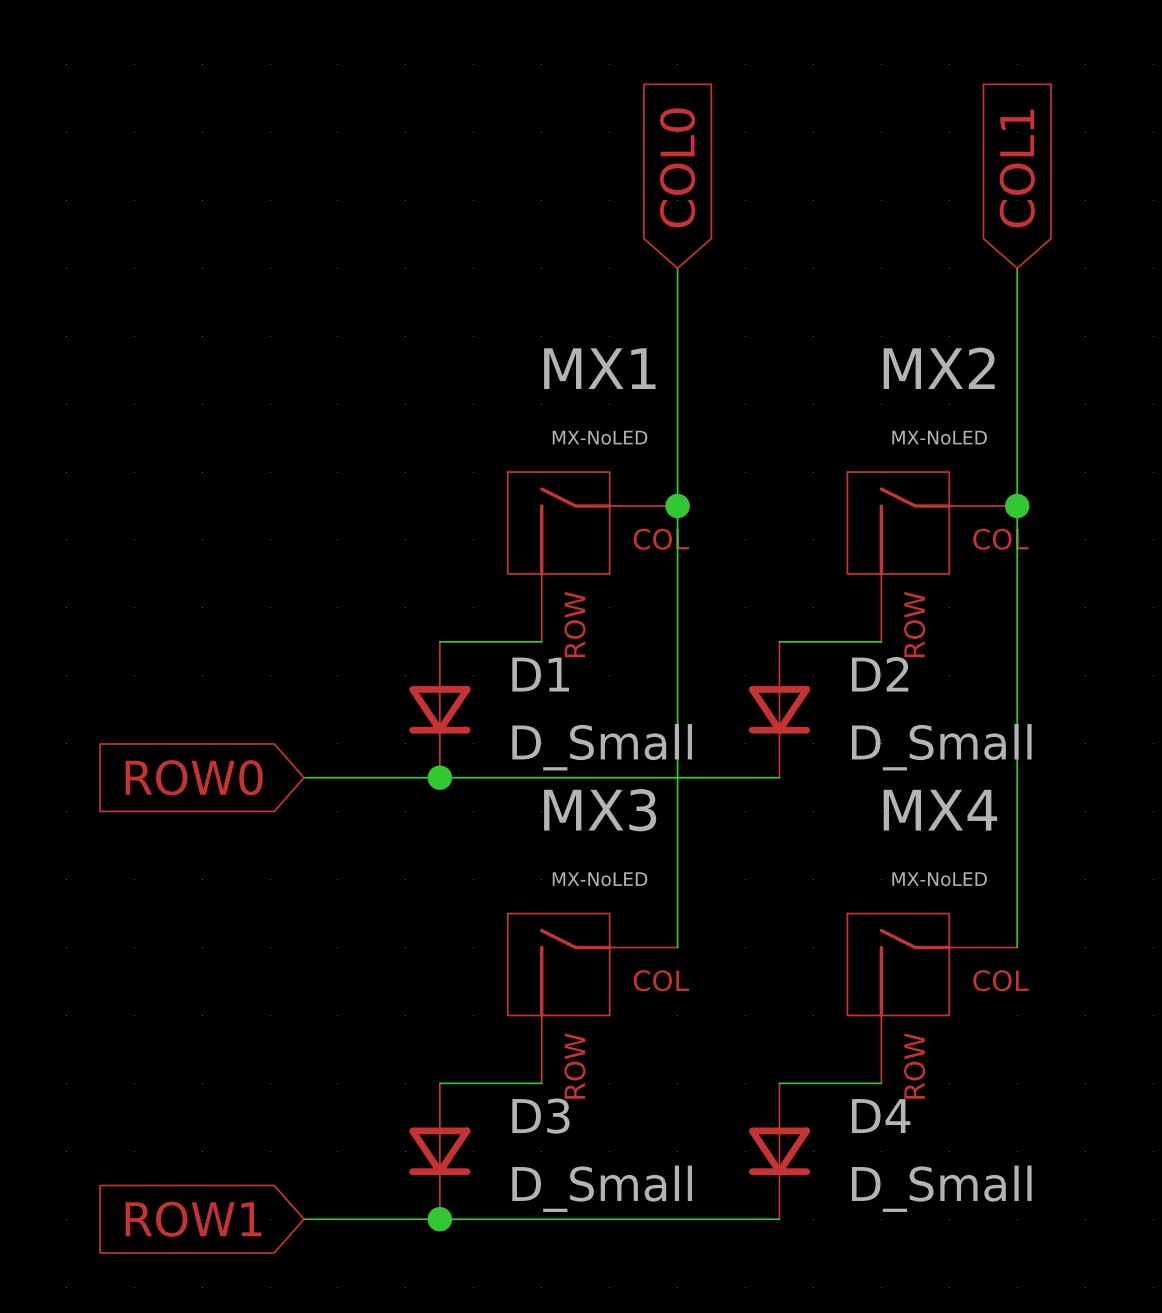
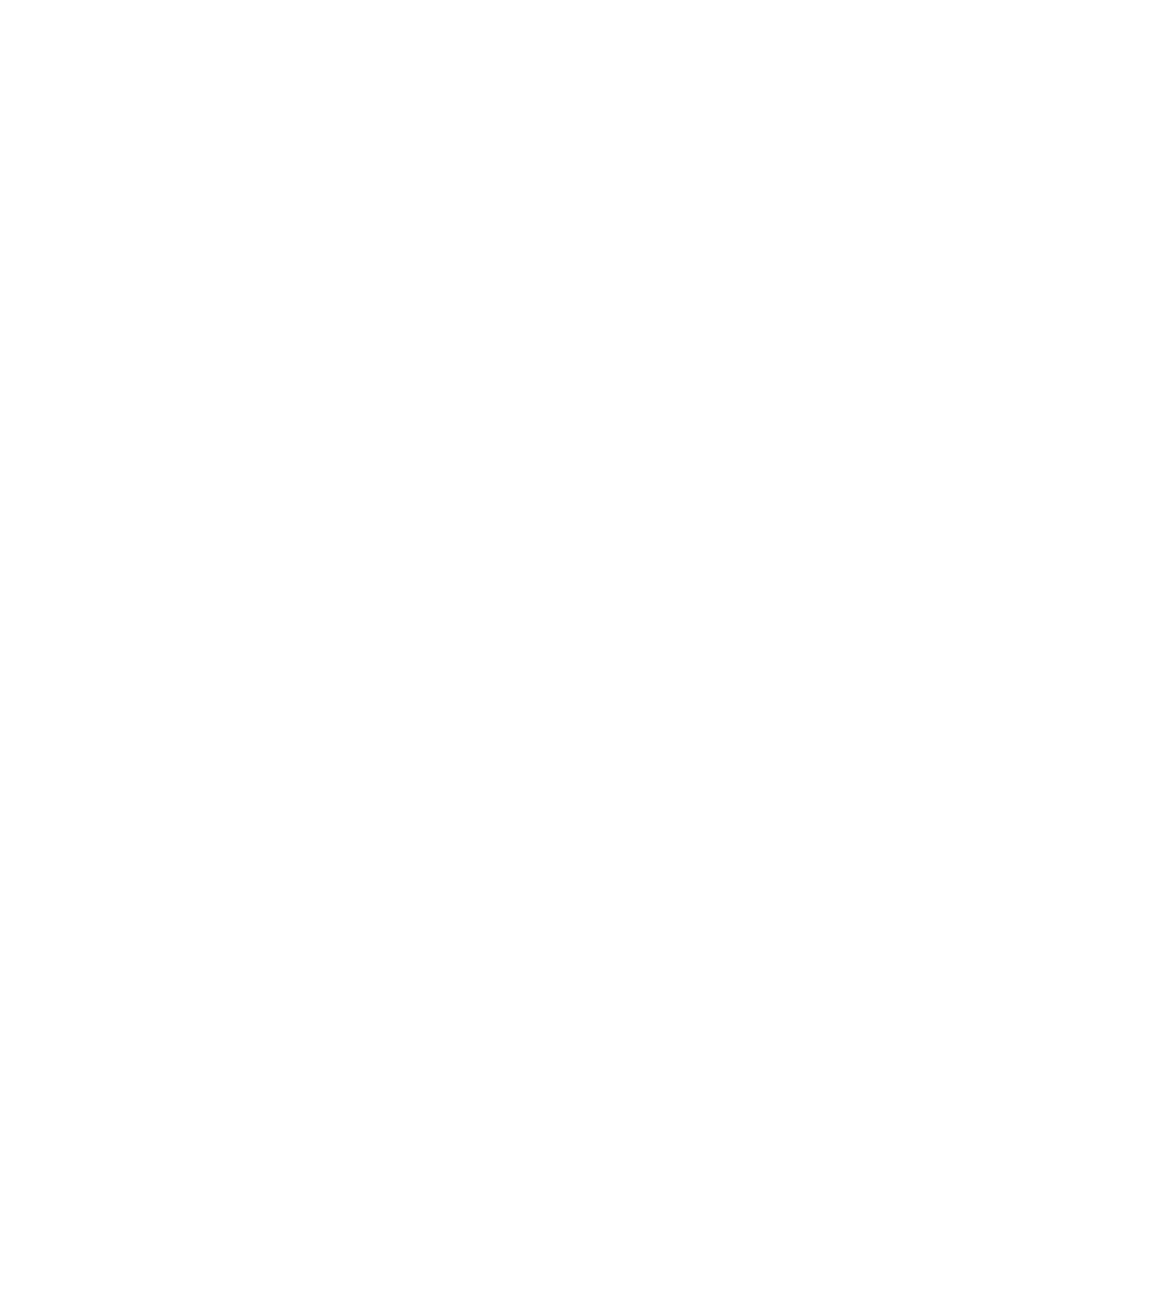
global label: COL0 (677, 167) -> none
global label: COL1 (1017, 168) -> none
wire: (677, 268) (677, 947) -> none
wire: (1017, 268) (1017, 947) -> none
junction: (677, 506) -> none
junction: (1017, 506) -> none
MX1: MX-NoLED (592, 556) -> none
MX2: MX-NoLED (932, 556) -> none
wire: (439, 641) (541, 641) -> none
wire: (779, 641) (881, 641) -> none
D1: D_Small (439, 709) -> none
D2: D_Small (779, 709) -> none
global label: ROW0 (194, 777) -> none
wire: (304, 777) (779, 777) -> none
junction: (439, 777) -> none
MX3: MX-NoLED (592, 998) -> none
MX4: MX-NoLED (932, 998) -> none
wire: (439, 1083) (541, 1083) -> none
wire: (779, 1083) (881, 1083) -> none
D3: D_Small (439, 1151) -> none
D4: D_Small (779, 1151) -> none
global label: ROW1 (193, 1219) -> none
wire: (304, 1219) (779, 1219) -> none
junction: (439, 1219) -> none

